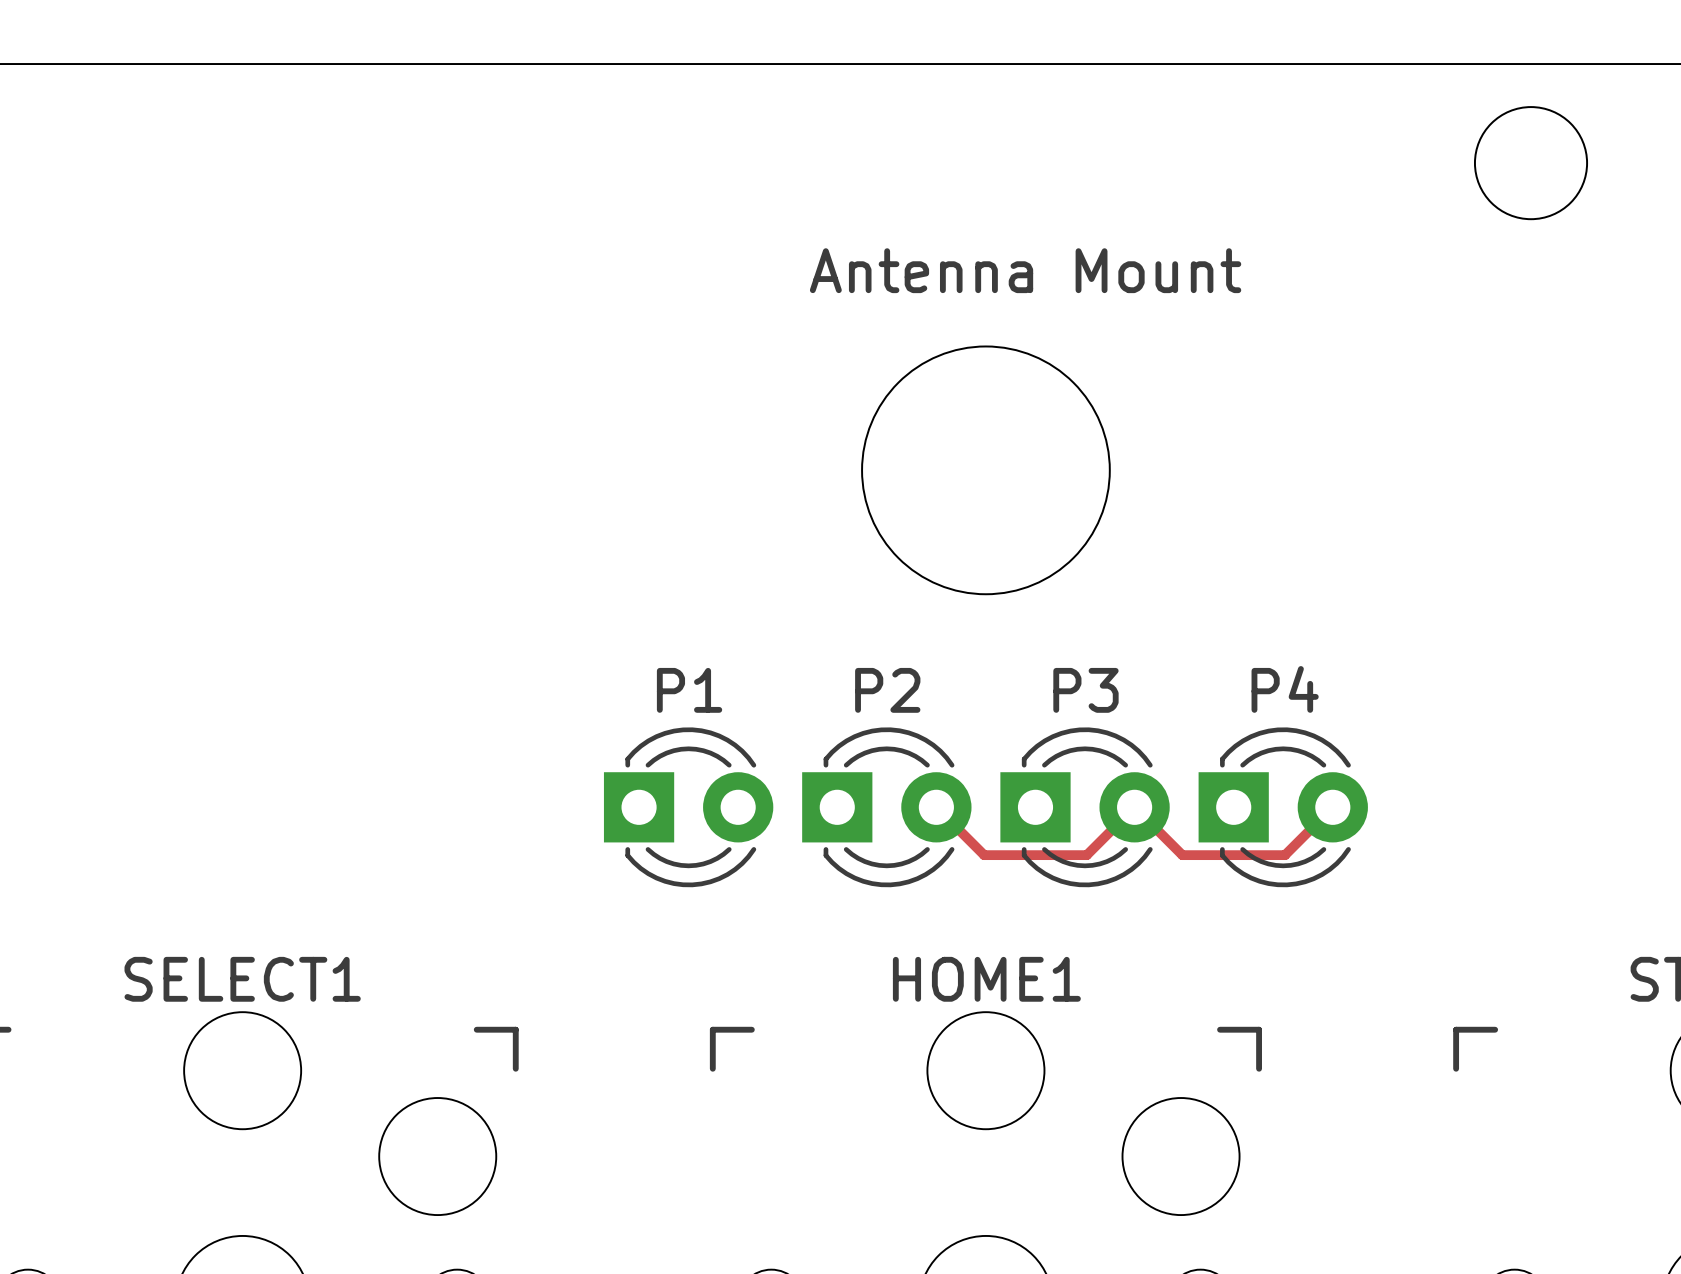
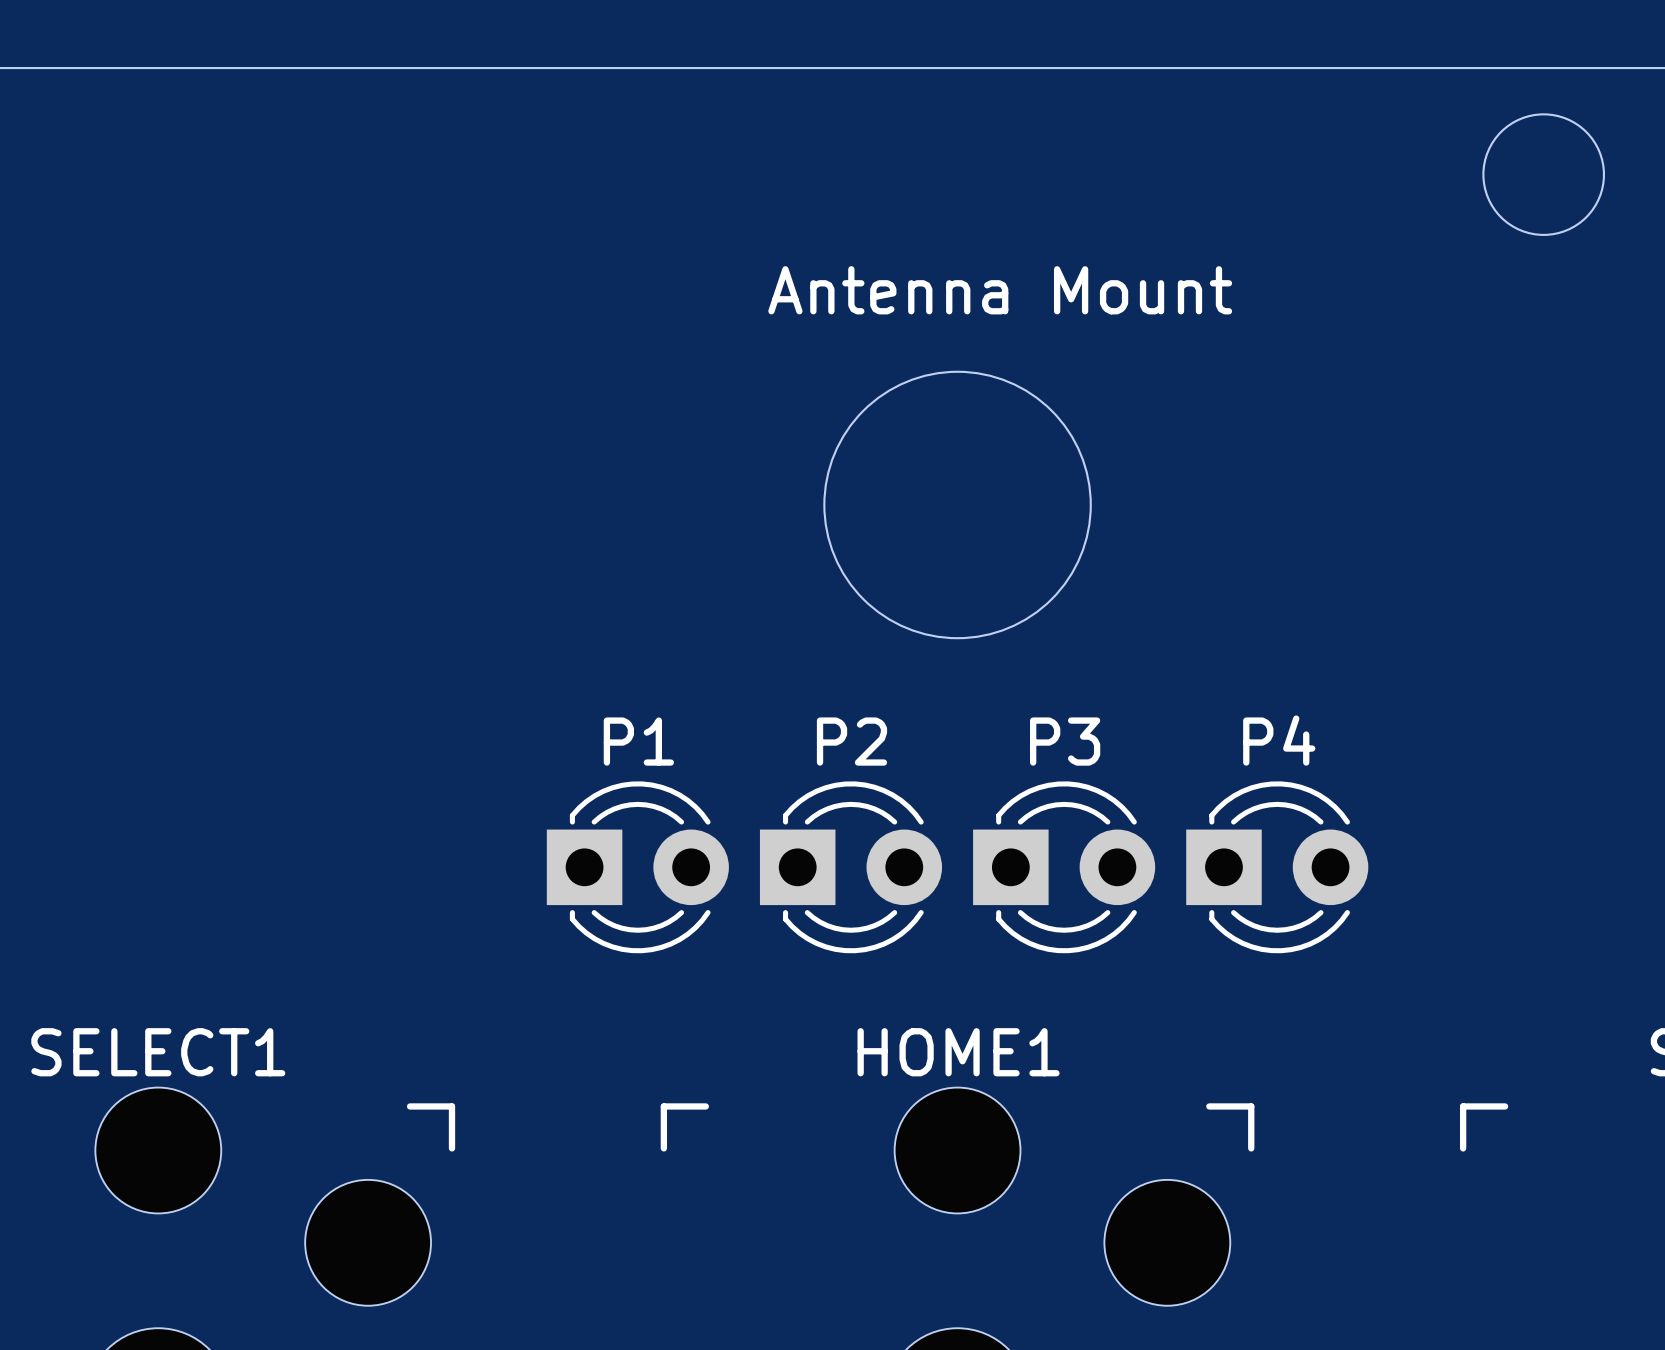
track: (936, 807) (984, 855) (1086, 855) (1134, 807) (1182, 855) (1285, 855) (1332, 807) -> none

